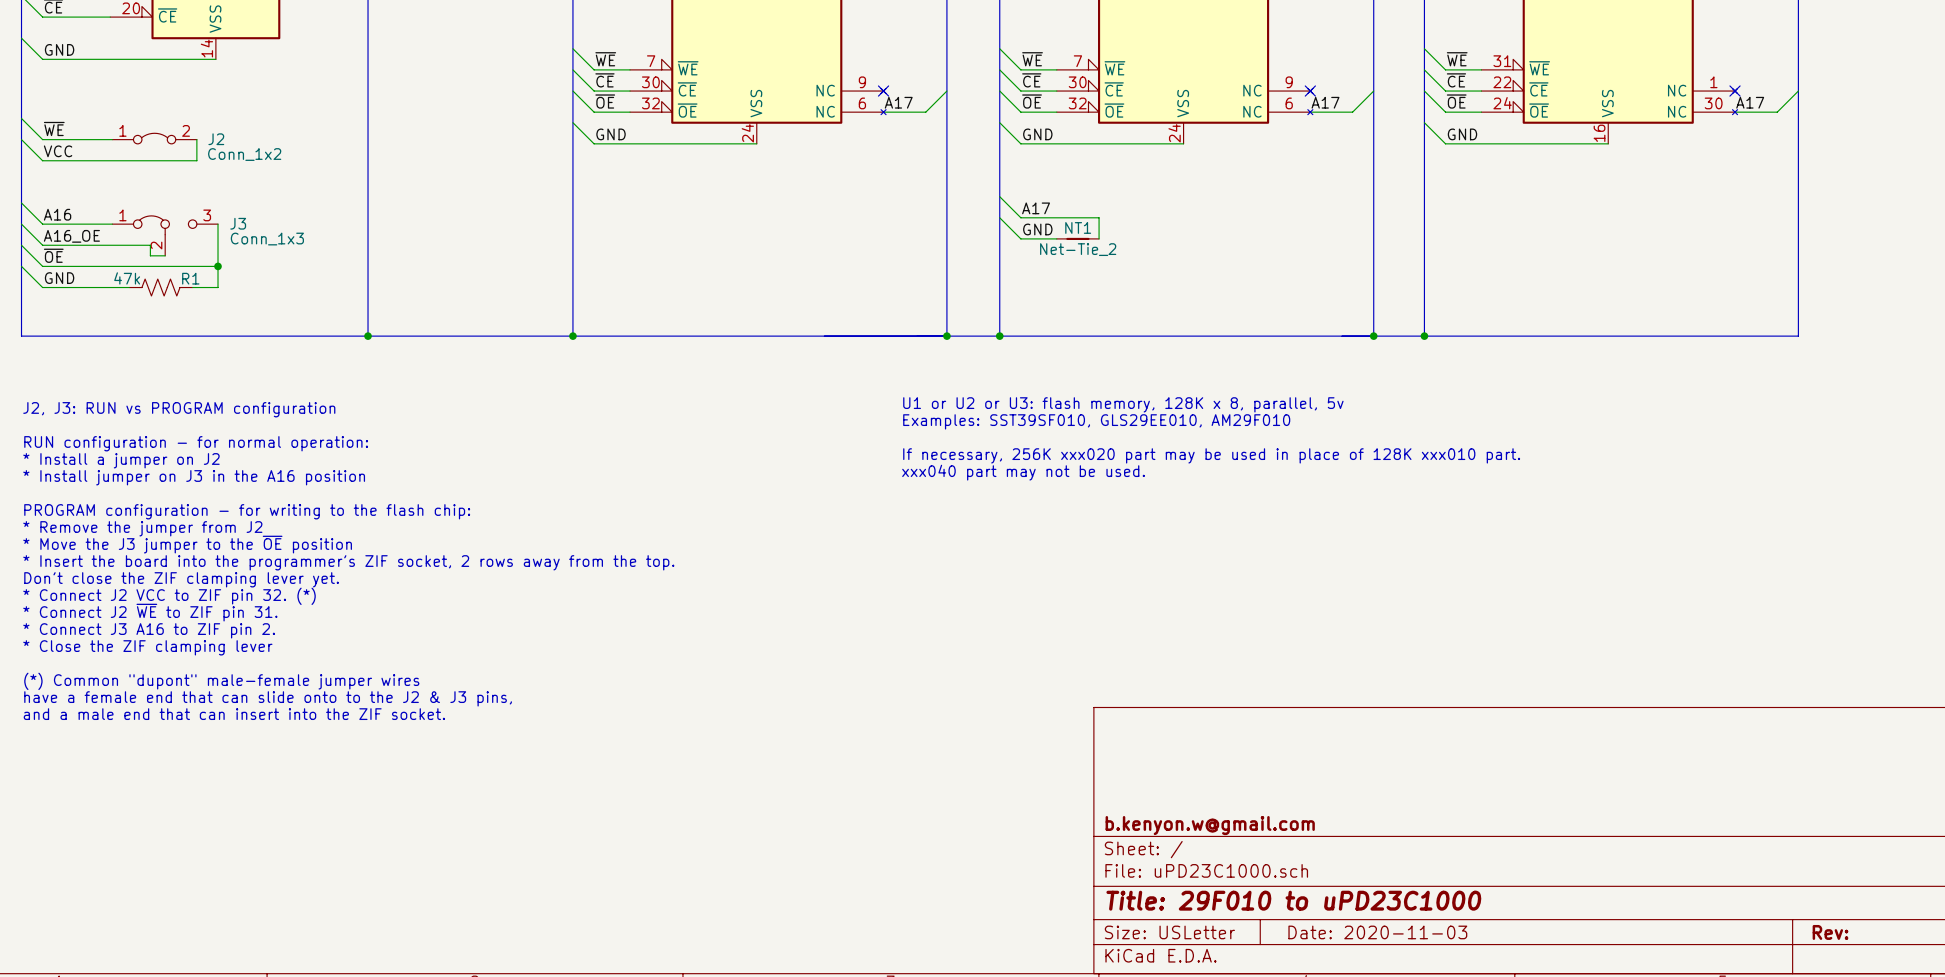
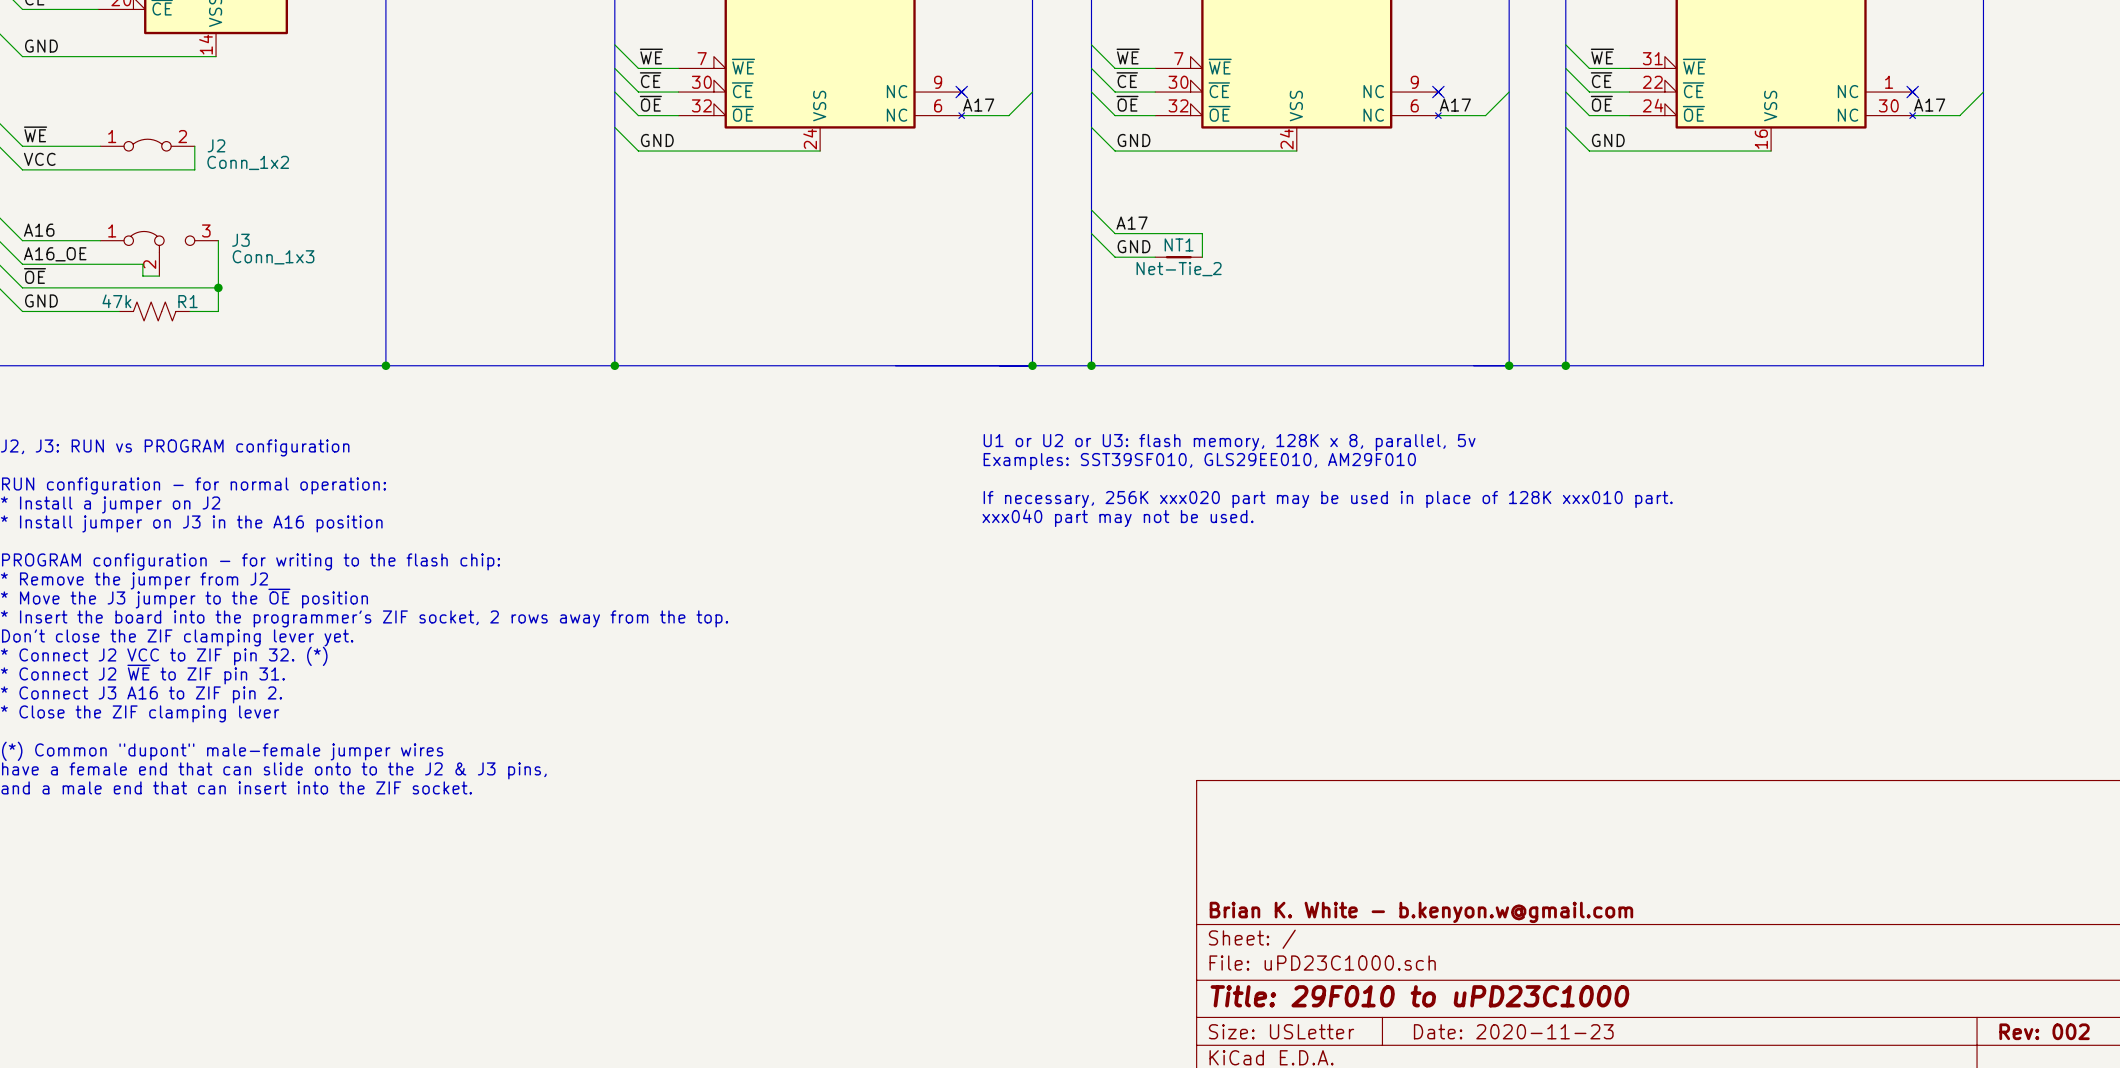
title block: b.kenyon.w@gmail.com (1210, 825) -> Brian K. White - b.kenyon.w@gmail.com (1421, 912)
title block: Date: 2020-11-03 (1377, 932) -> Date: 2020-11-23 (1513, 1031)
title block: Rev: (1830, 932) -> Rev: 002 (2044, 1031)

